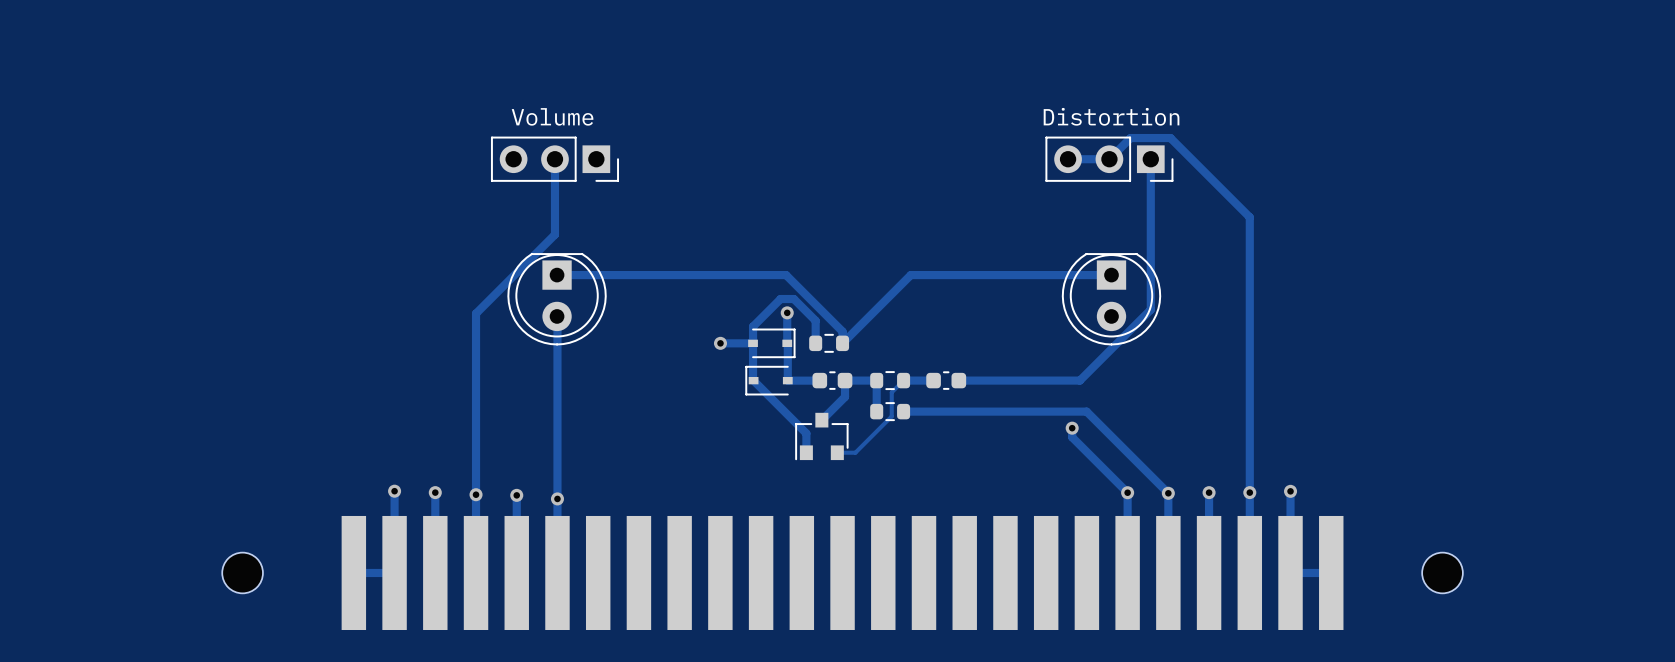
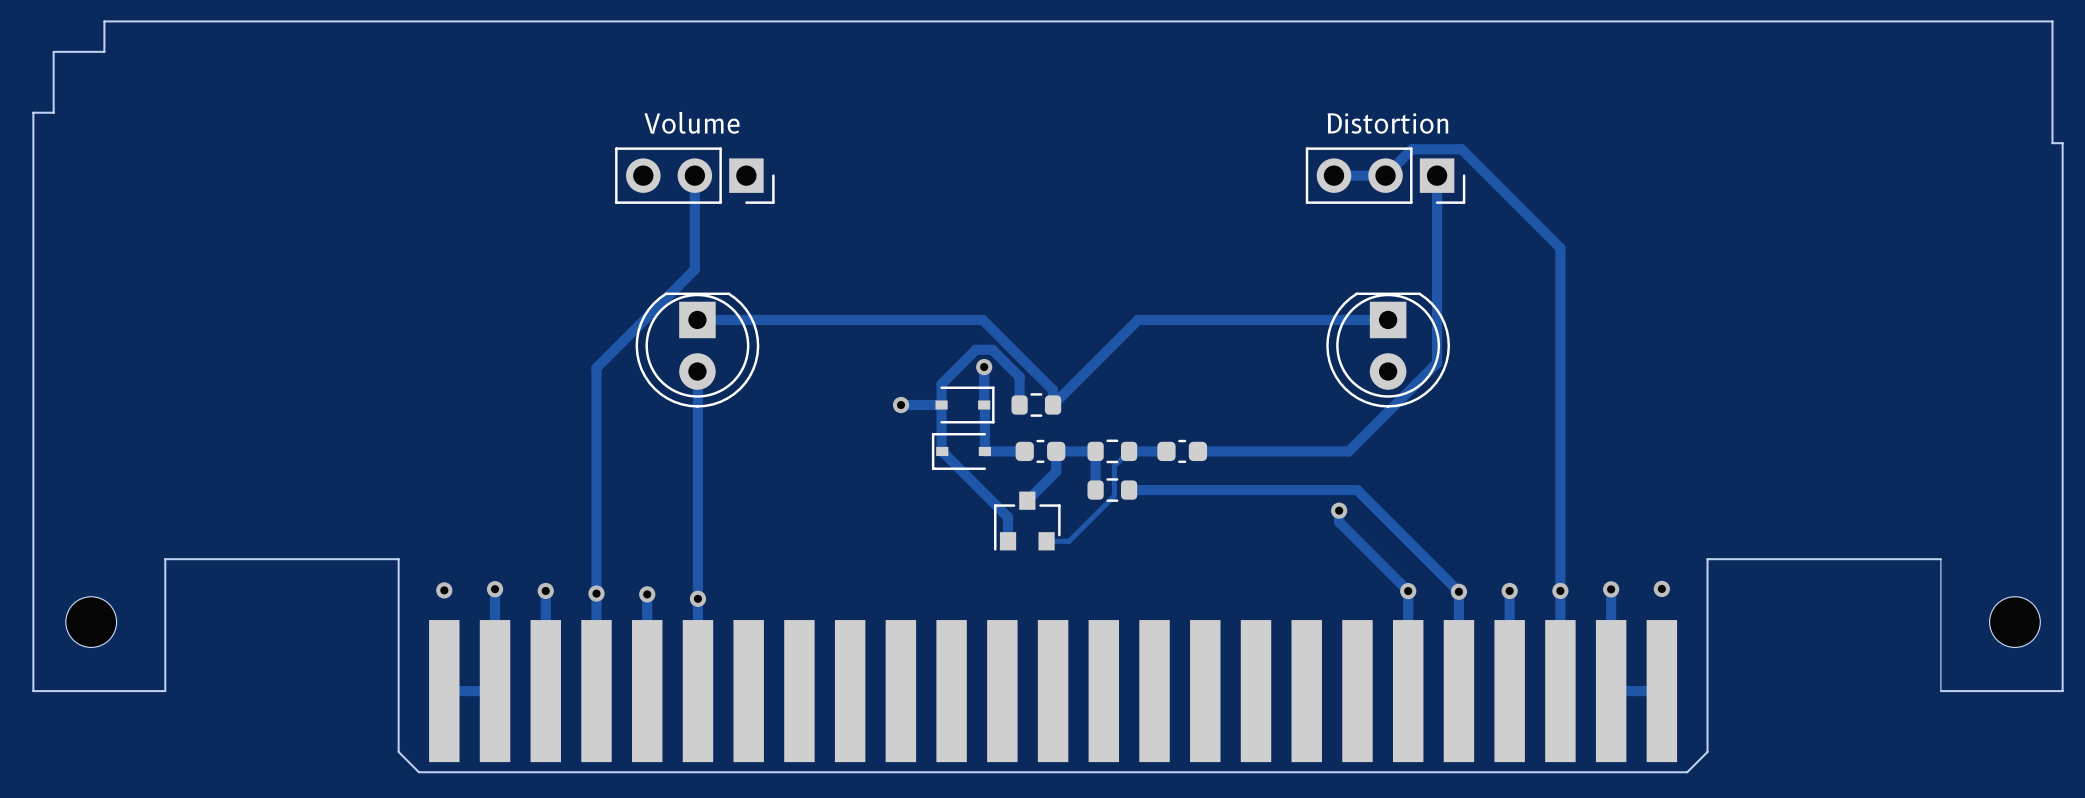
board edge: none -> (104, 21) (2052, 21) (2052, 143) (2062, 143) (2062, 691) (1940, 691) (1940, 559) (1707, 559) (1707, 751) (1687, 772) (418, 772) (398, 751) (398, 559) (165, 559) (165, 691) (33, 691) (33, 112) (53, 112) (53, 51) (104, 51) (104, 21)
via: none -> (1661, 588)
via: none -> (444, 590)
part position: (242, 572) -> (91, 622)
part position: (1442, 572) -> (2014, 622)

